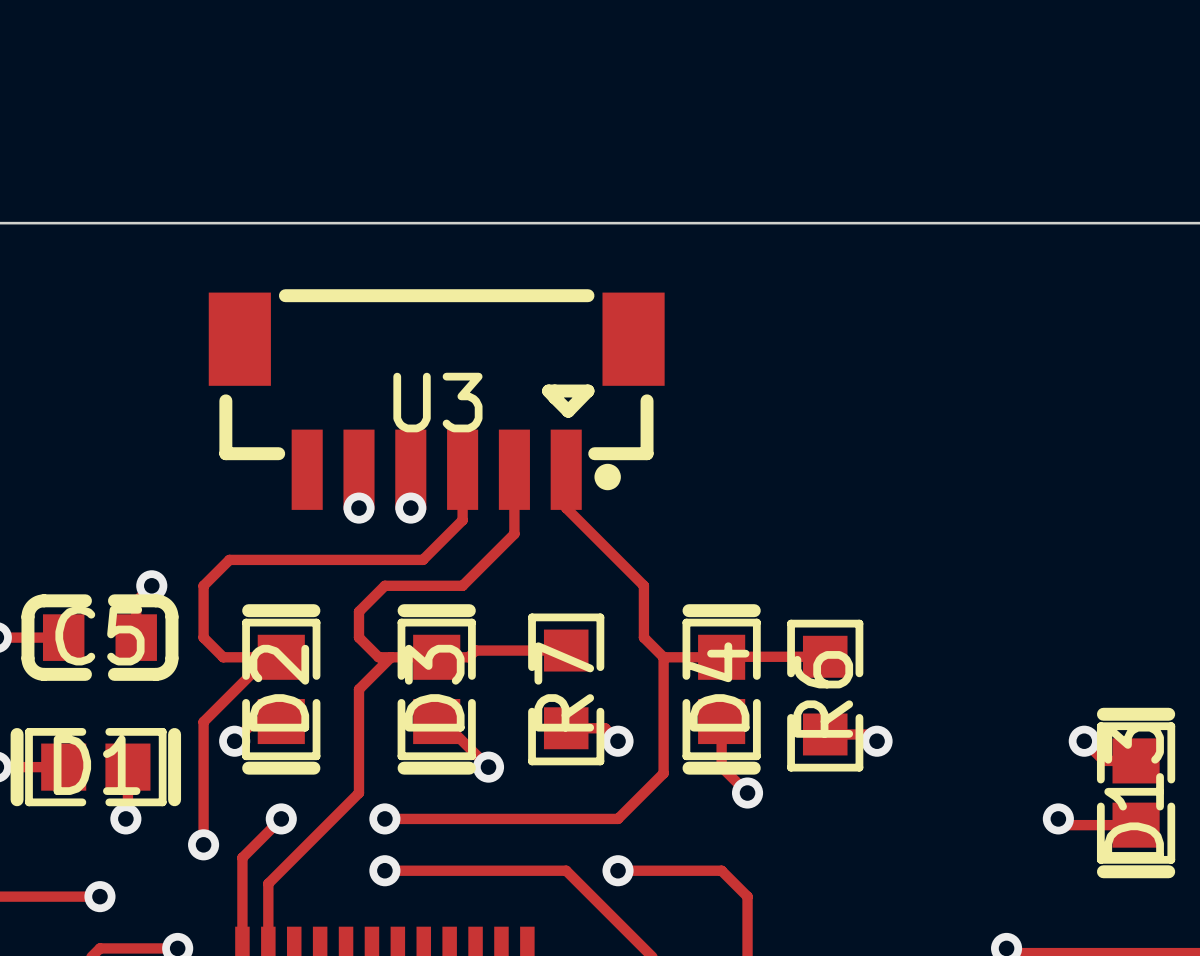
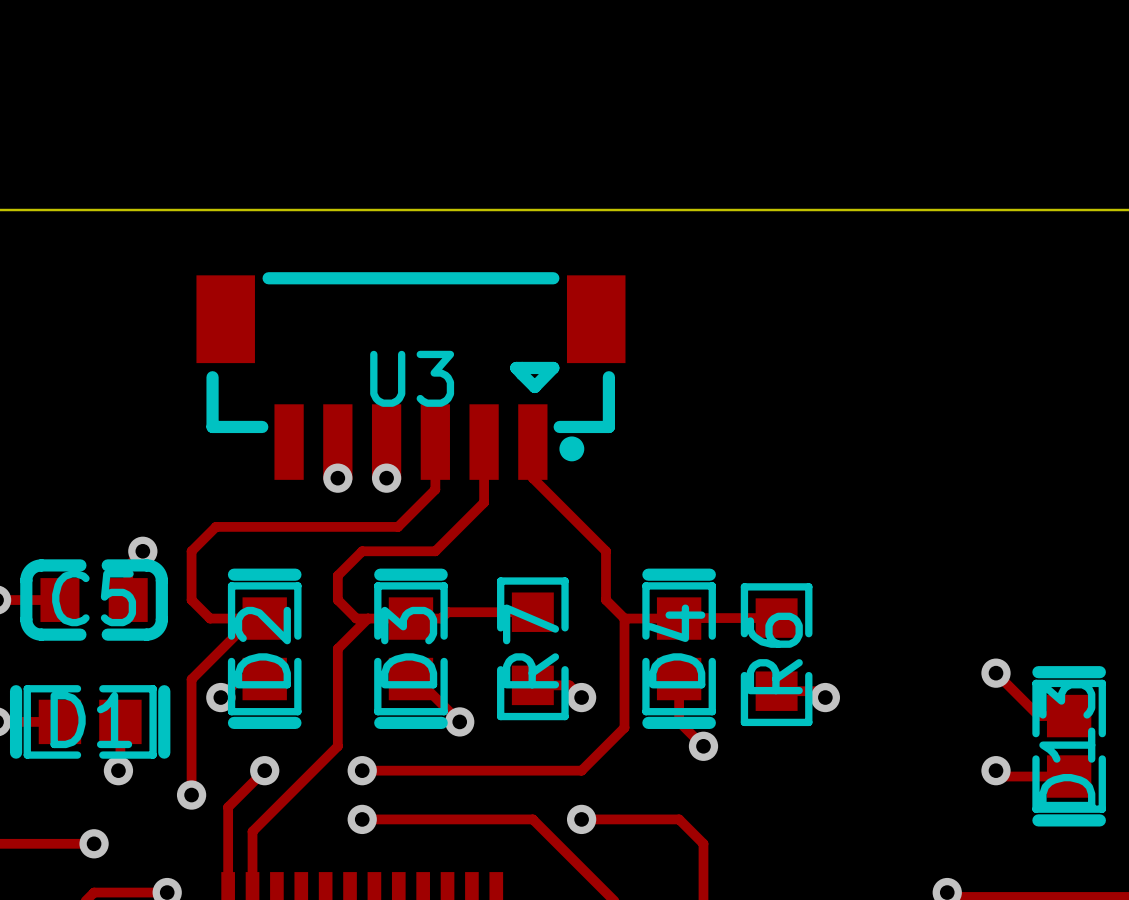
track: none -> (996, 673) (1020, 697)
via position: (1084, 741) -> (996, 673)

